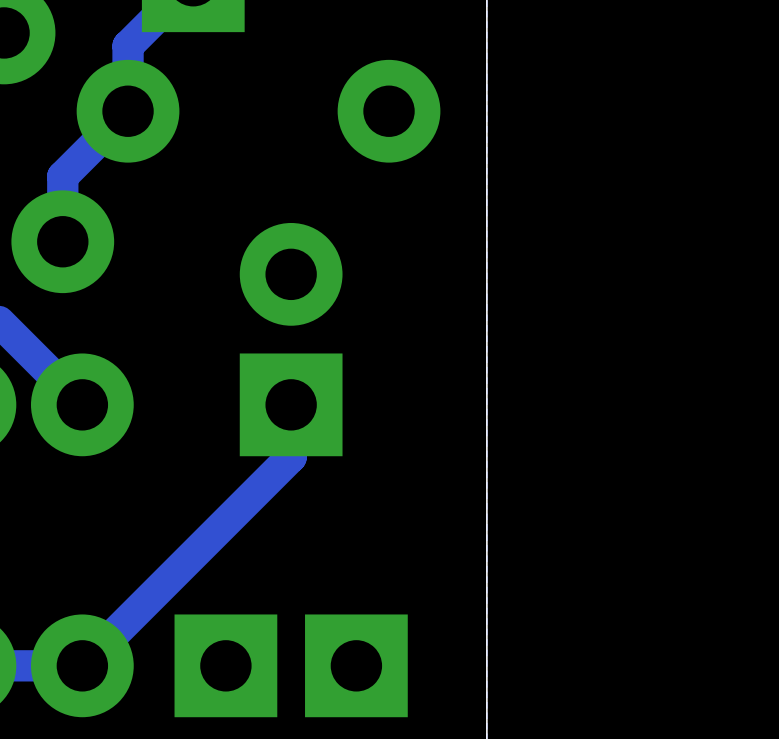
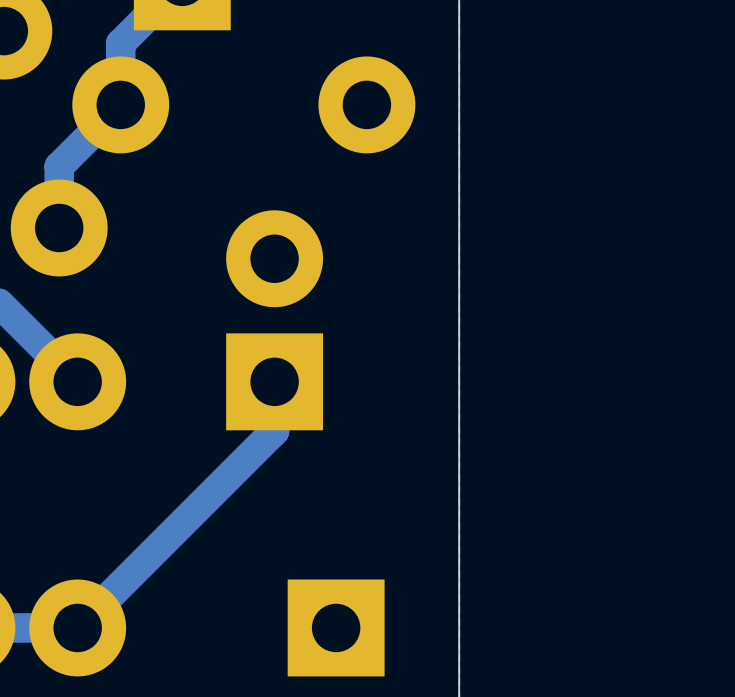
part: (225, 665) -> none

